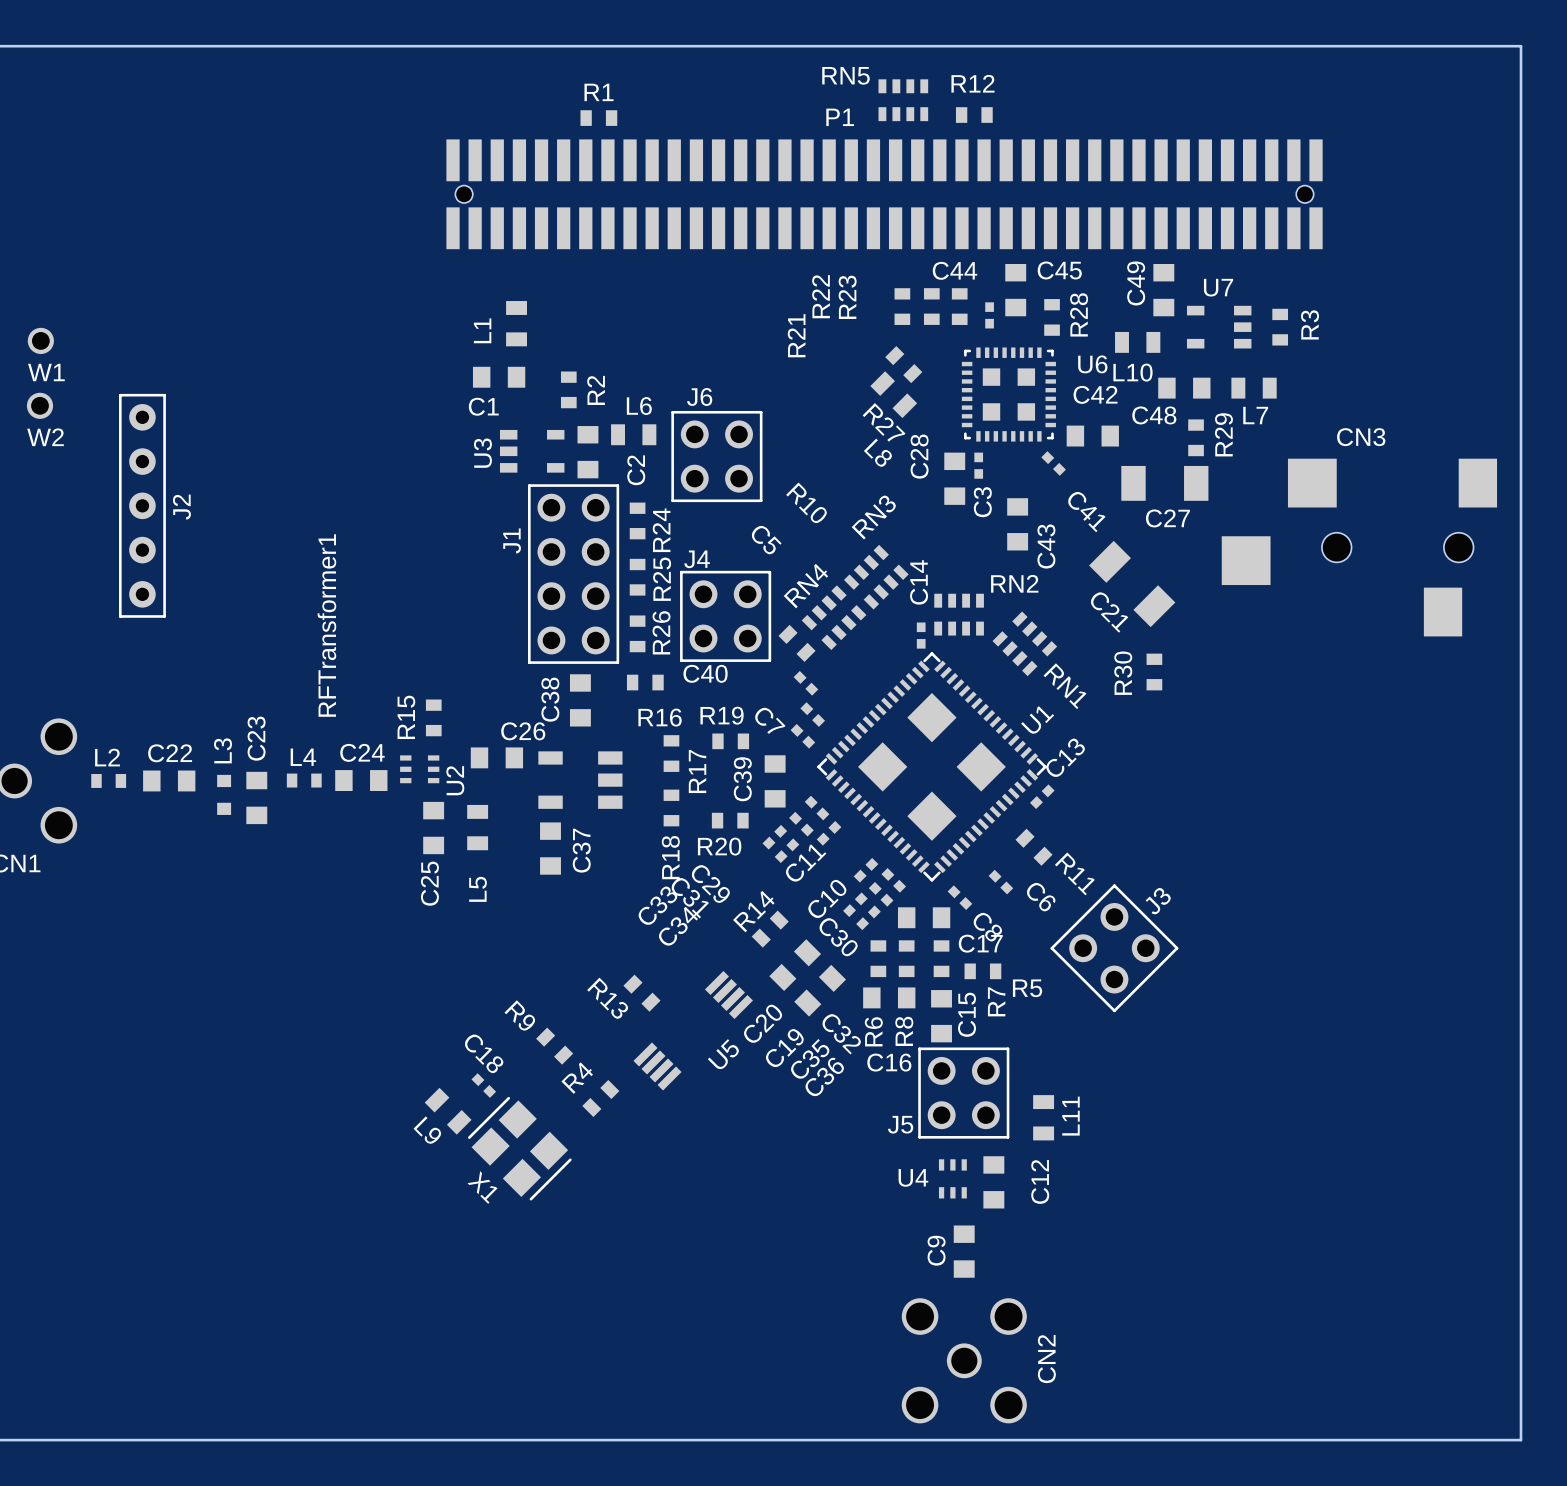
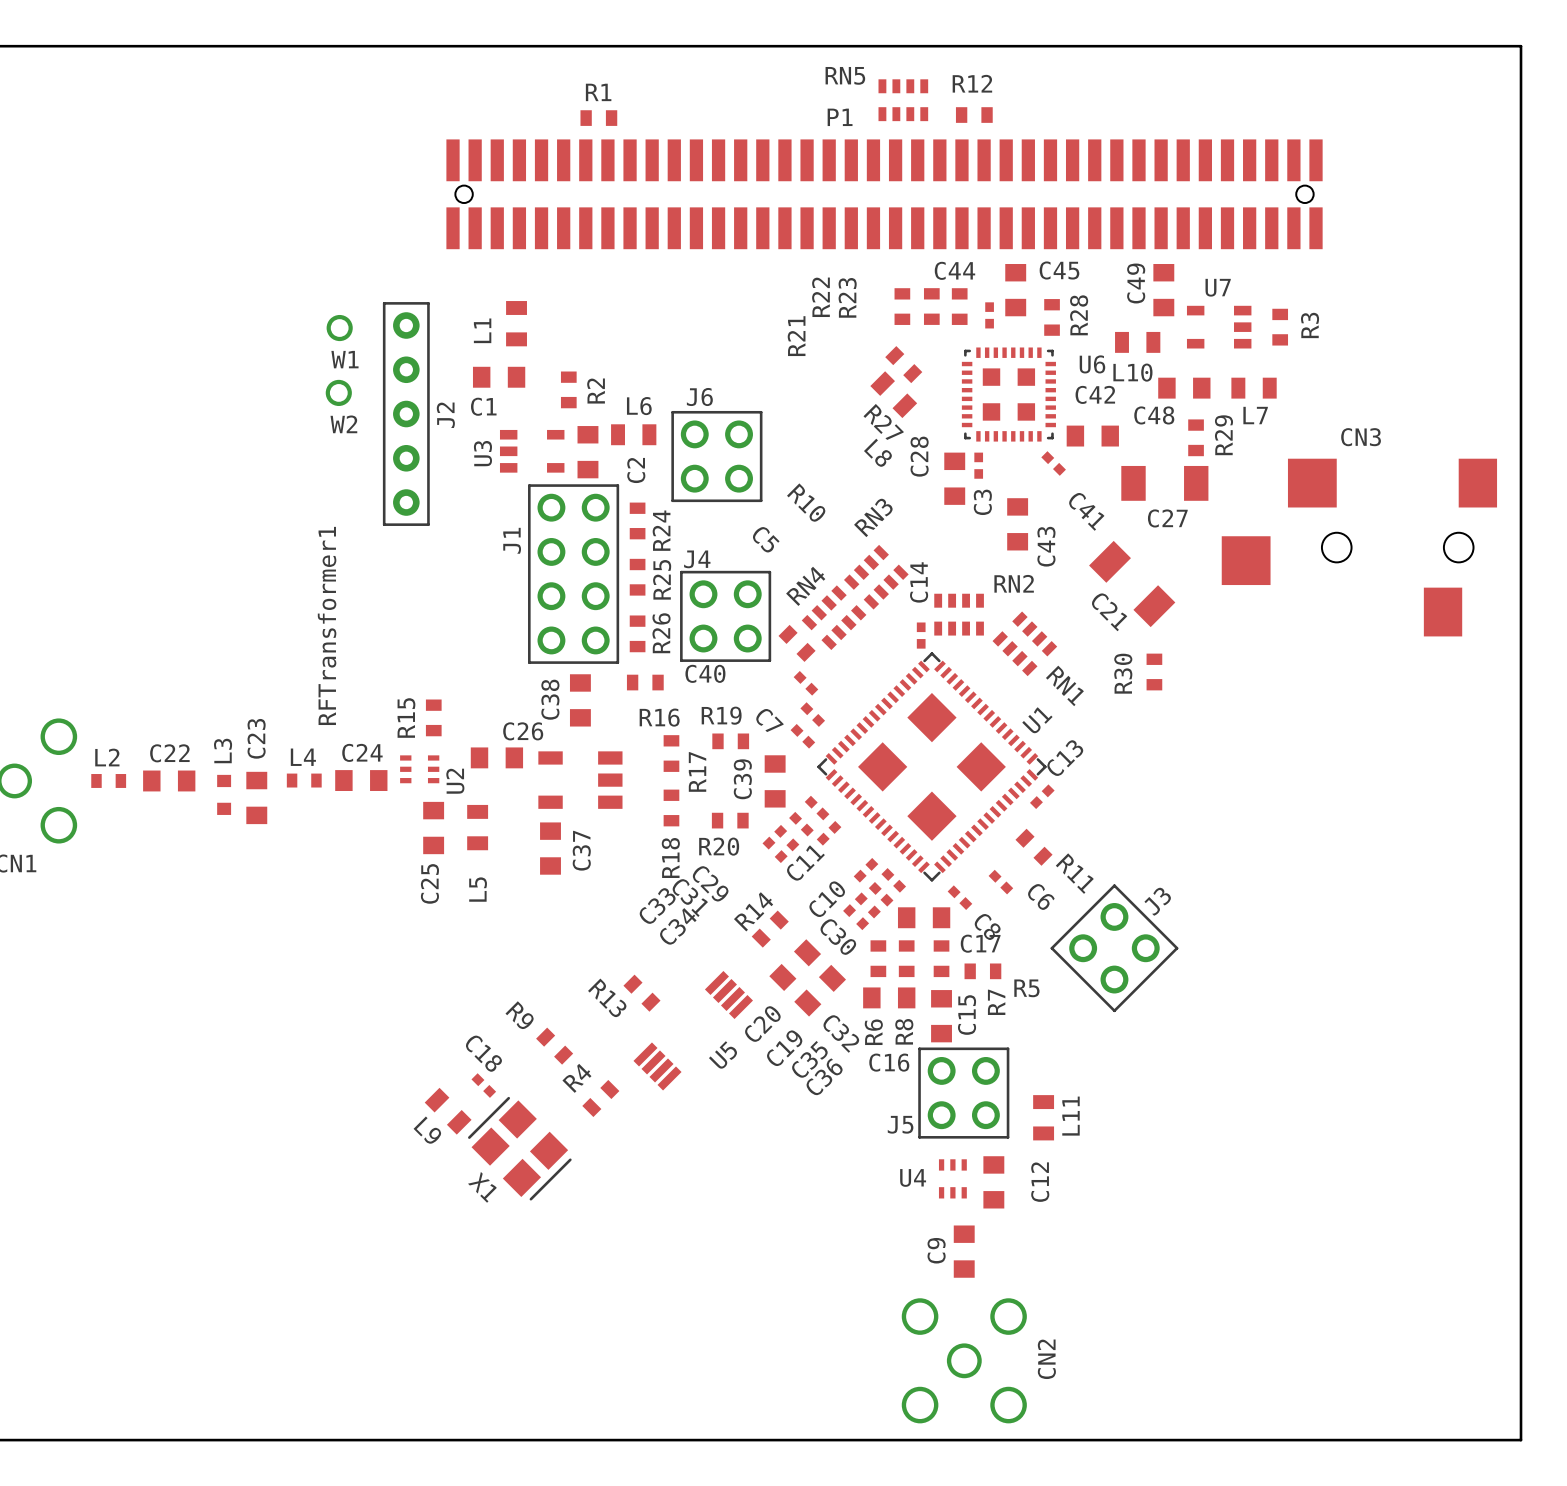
W1 position: (40, 340) -> (339, 328)
W2 position: (39, 405) -> (338, 392)
J2 position: (142, 505) -> (406, 414)

